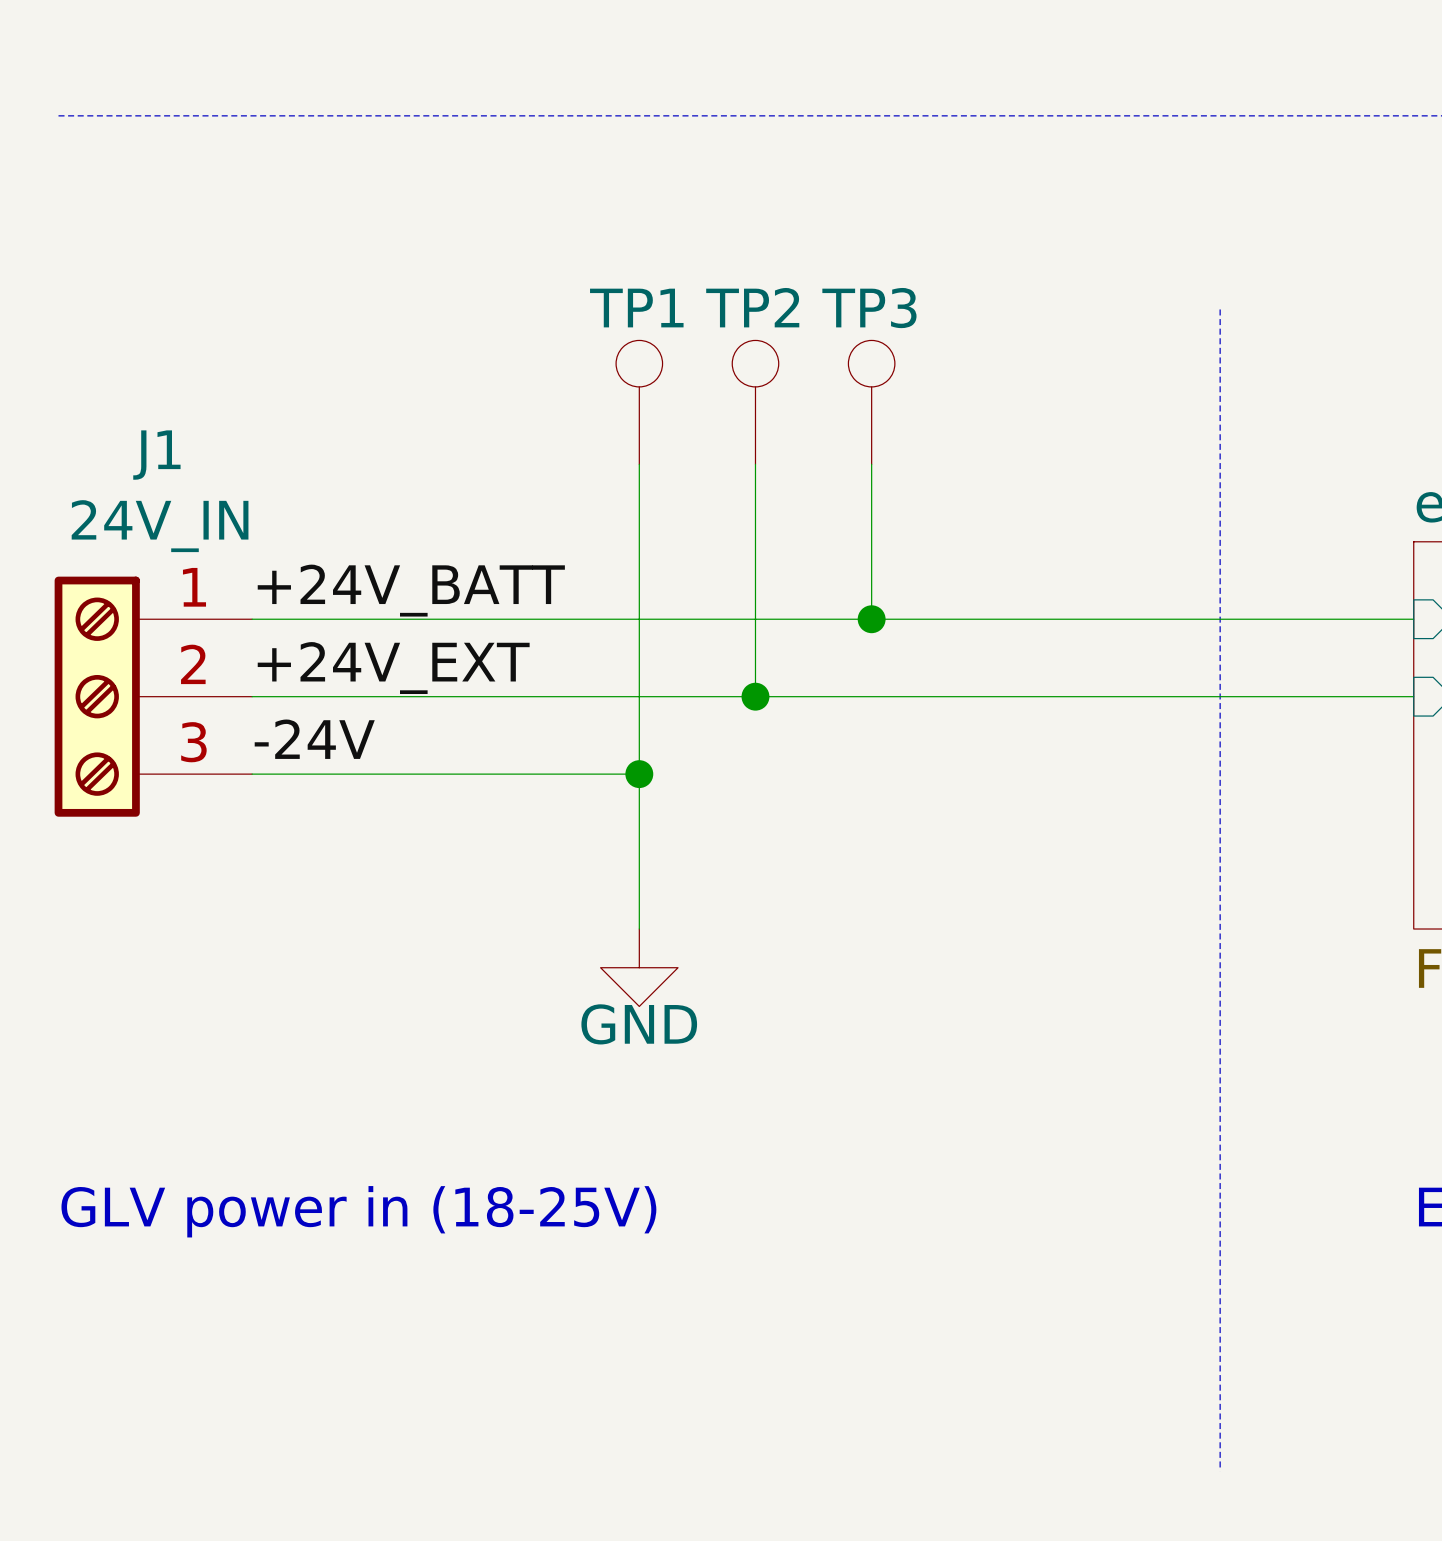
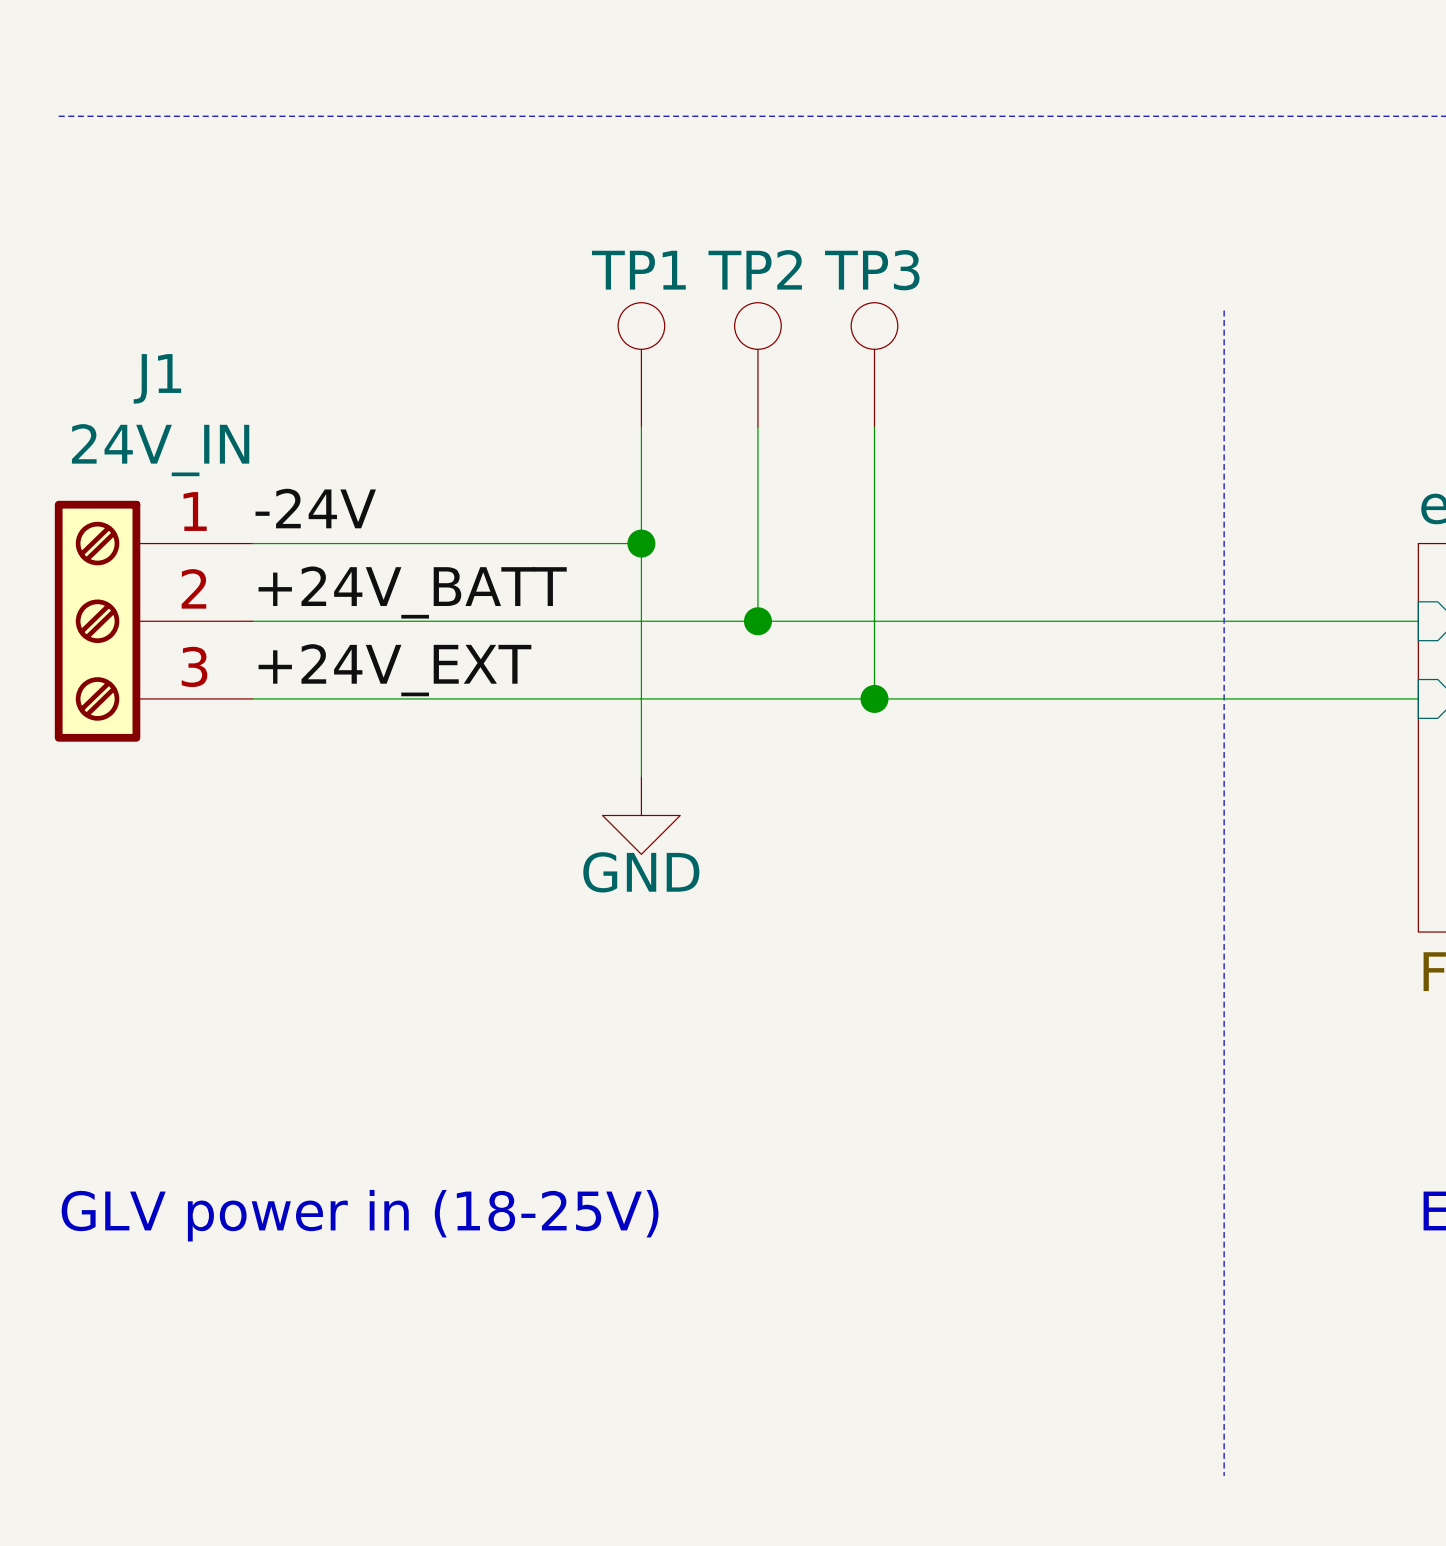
TP1 position: (639, 402) -> (641, 364)
TP2 position: (755, 402) -> (757, 364)
TP3 position: (871, 402) -> (874, 364)
wire: none -> (252, 543) (641, 543)
junction: none -> (641, 543)
wire: (755, 619) (755, 696) -> (874, 621) (874, 698)
junction: none -> (757, 621)
junction: (871, 619) -> none
J1 position: (153, 696) -> (153, 621)
junction: (755, 696) -> none
junction: none -> (874, 698)
label position: -24V (314, 739) -> -24V (315, 508)
wire: (252, 774) (639, 774) (639, 929) -> none
junction: (639, 774) -> none
power symbol position: GND (639, 967) -> GND (641, 815)

